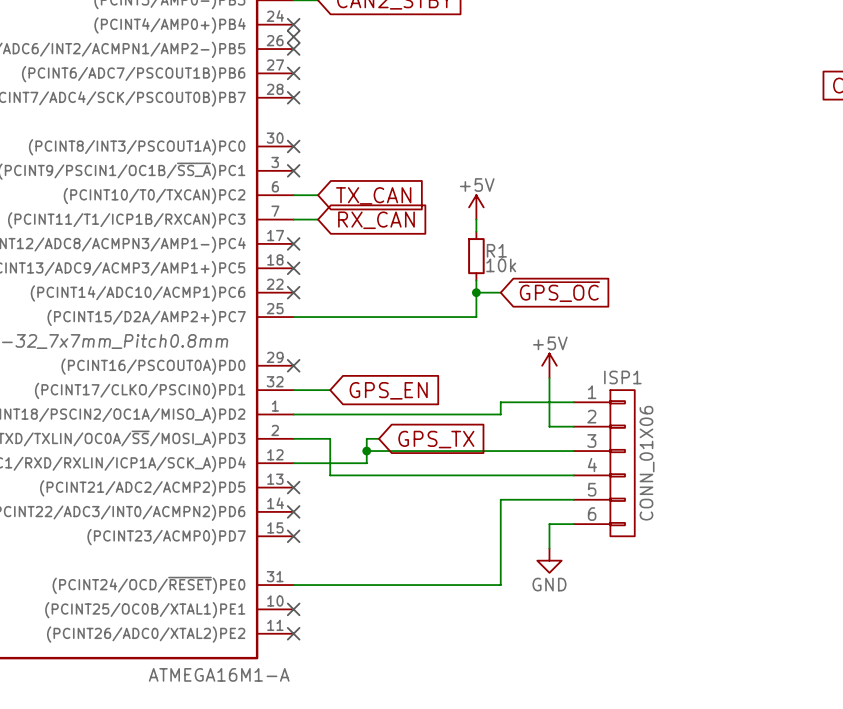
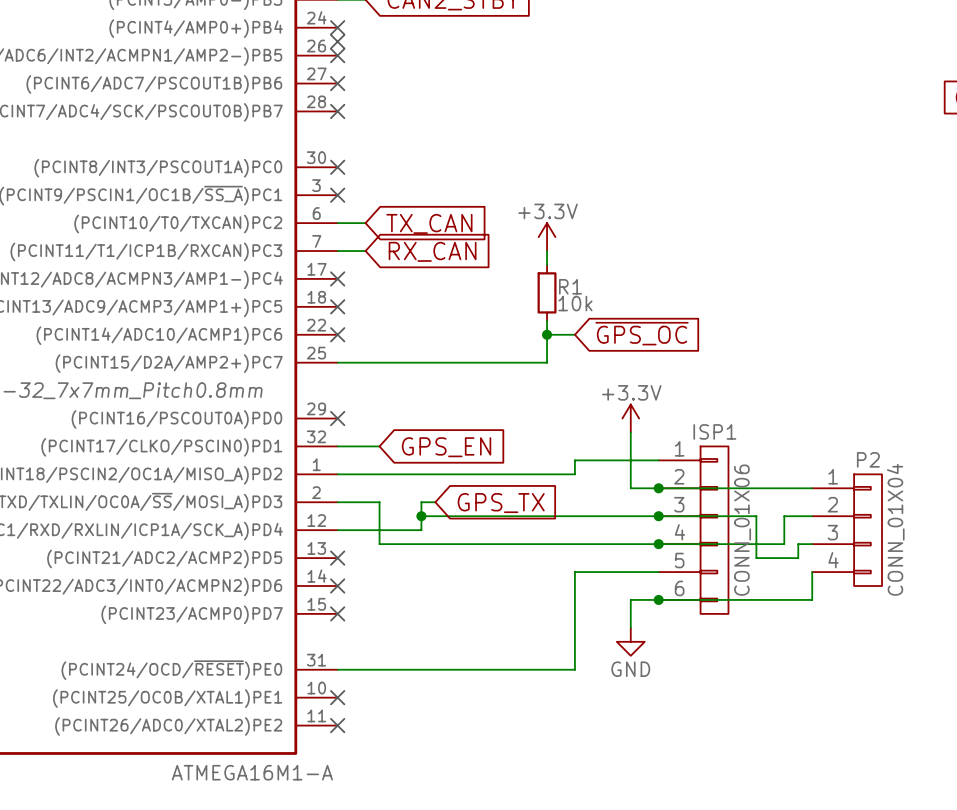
power symbol: +5V (476, 207) -> +3.3V (547, 237)
power symbol: +5V (549, 365) -> +3.3V (630, 418)
wire: none -> (658, 488) (812, 488)
junction: none -> (658, 488)
wire: none -> (658, 516) (756, 516) (756, 558) (798, 558) (798, 544) (812, 544)
junction: none -> (658, 516)
wire: none -> (812, 516) (784, 516) (784, 544) (658, 544)
P2: none -> CONN_01X04 (847, 530)
junction: none -> (658, 544)
wire: none -> (812, 572) (812, 599) (658, 599)
junction: none -> (658, 599)

